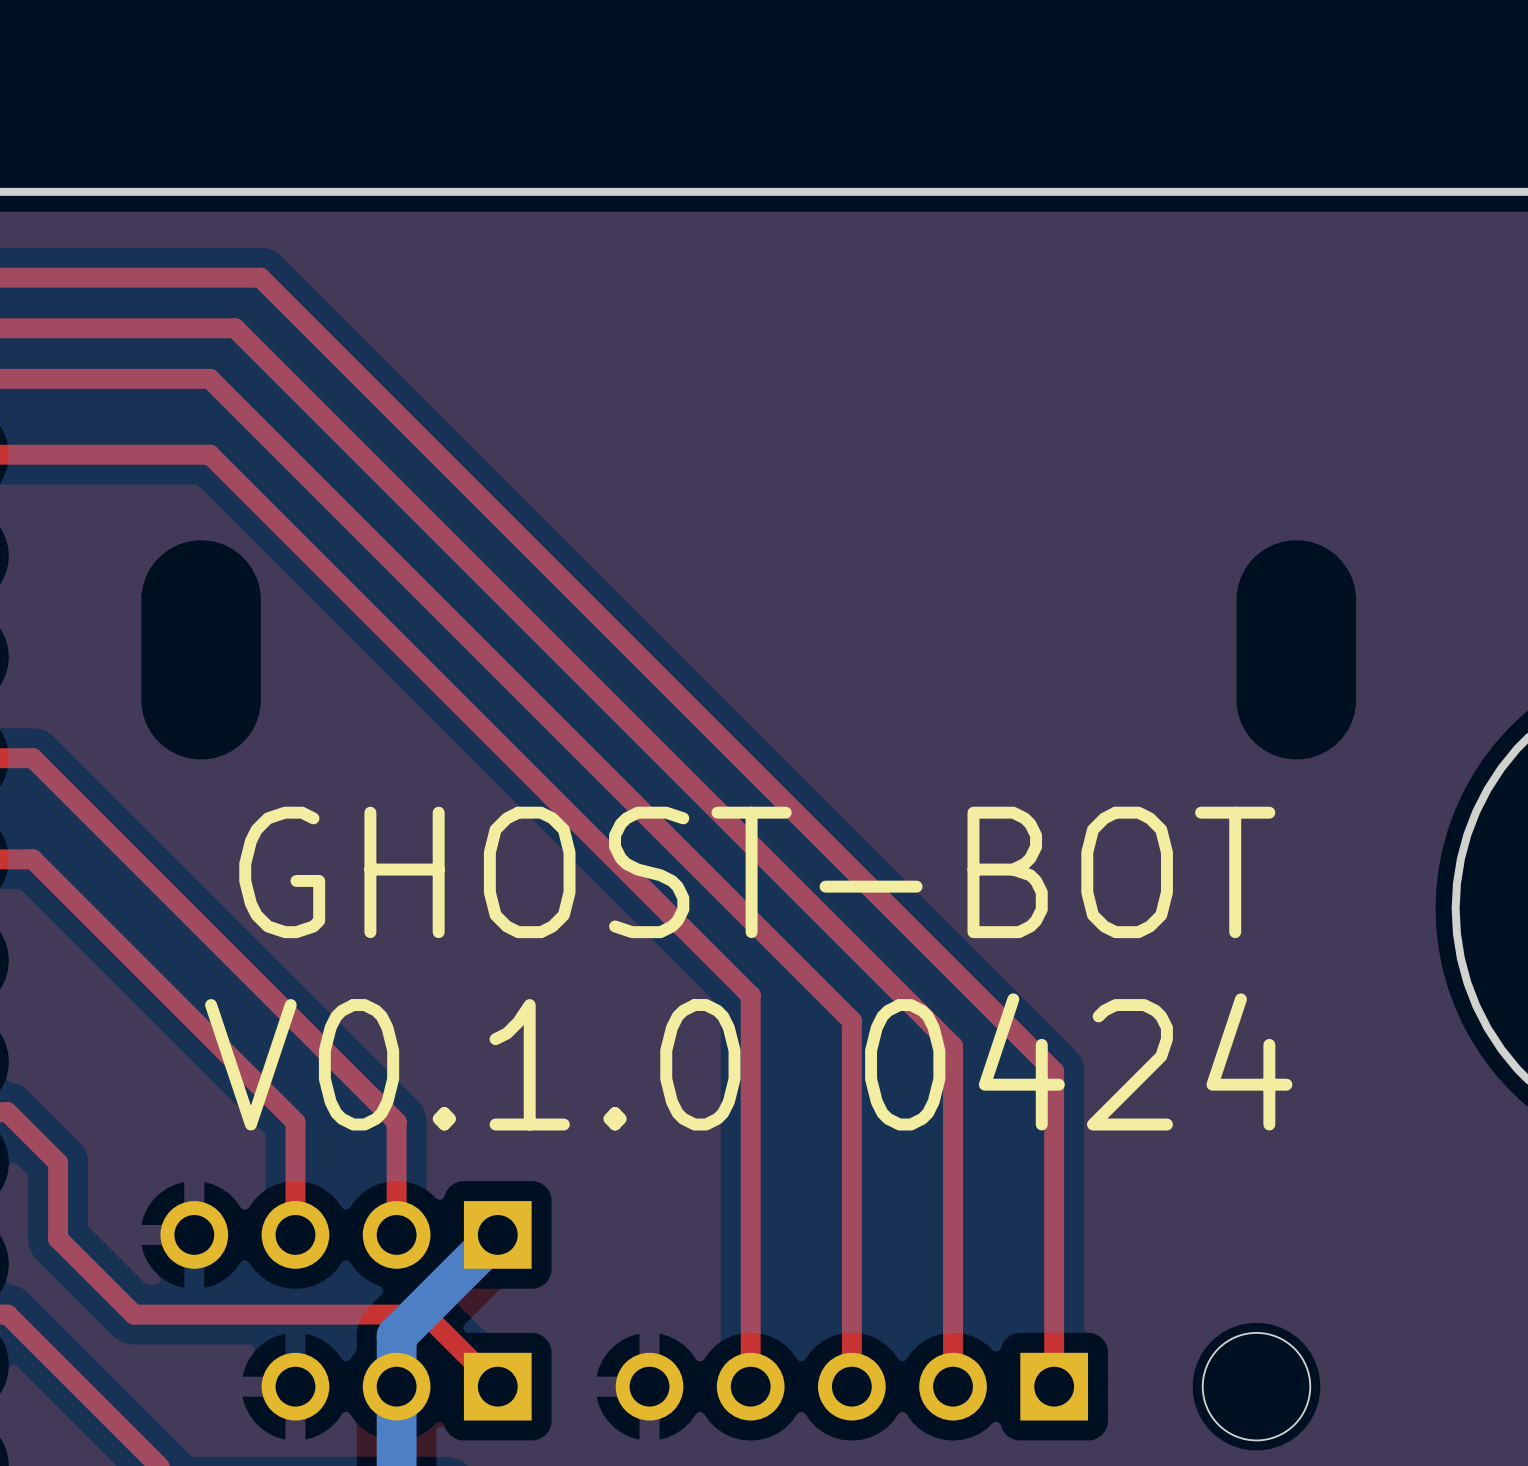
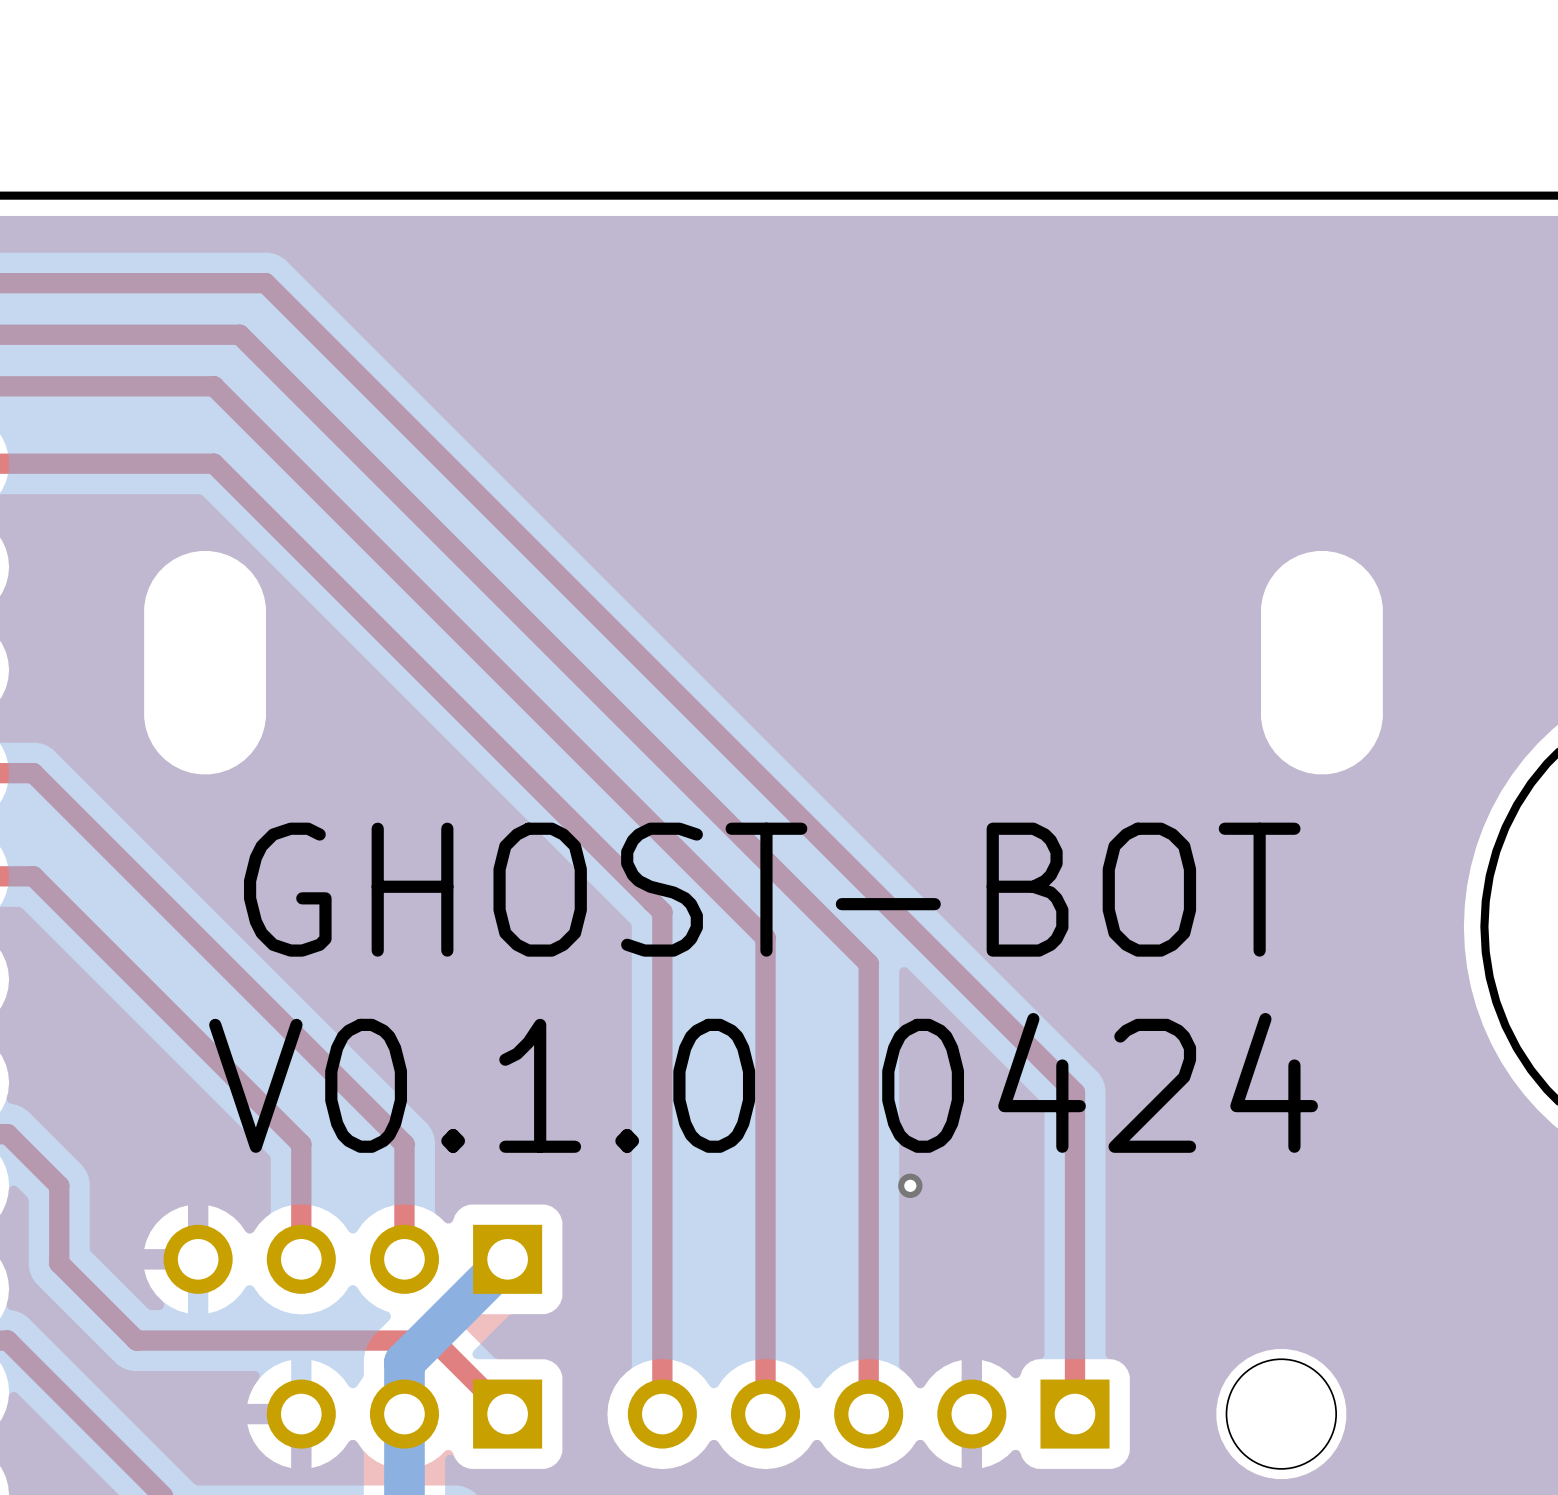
top track: (649, 894) (750, 995) -> (662, 912) (662, 1414)
top track: (750, 919) (851, 1020) -> (765, 937) (765, 1015)
top track: (851, 944) (953, 1046) (953, 1386) -> (868, 963) (868, 1041)
via: none -> (910, 1185)

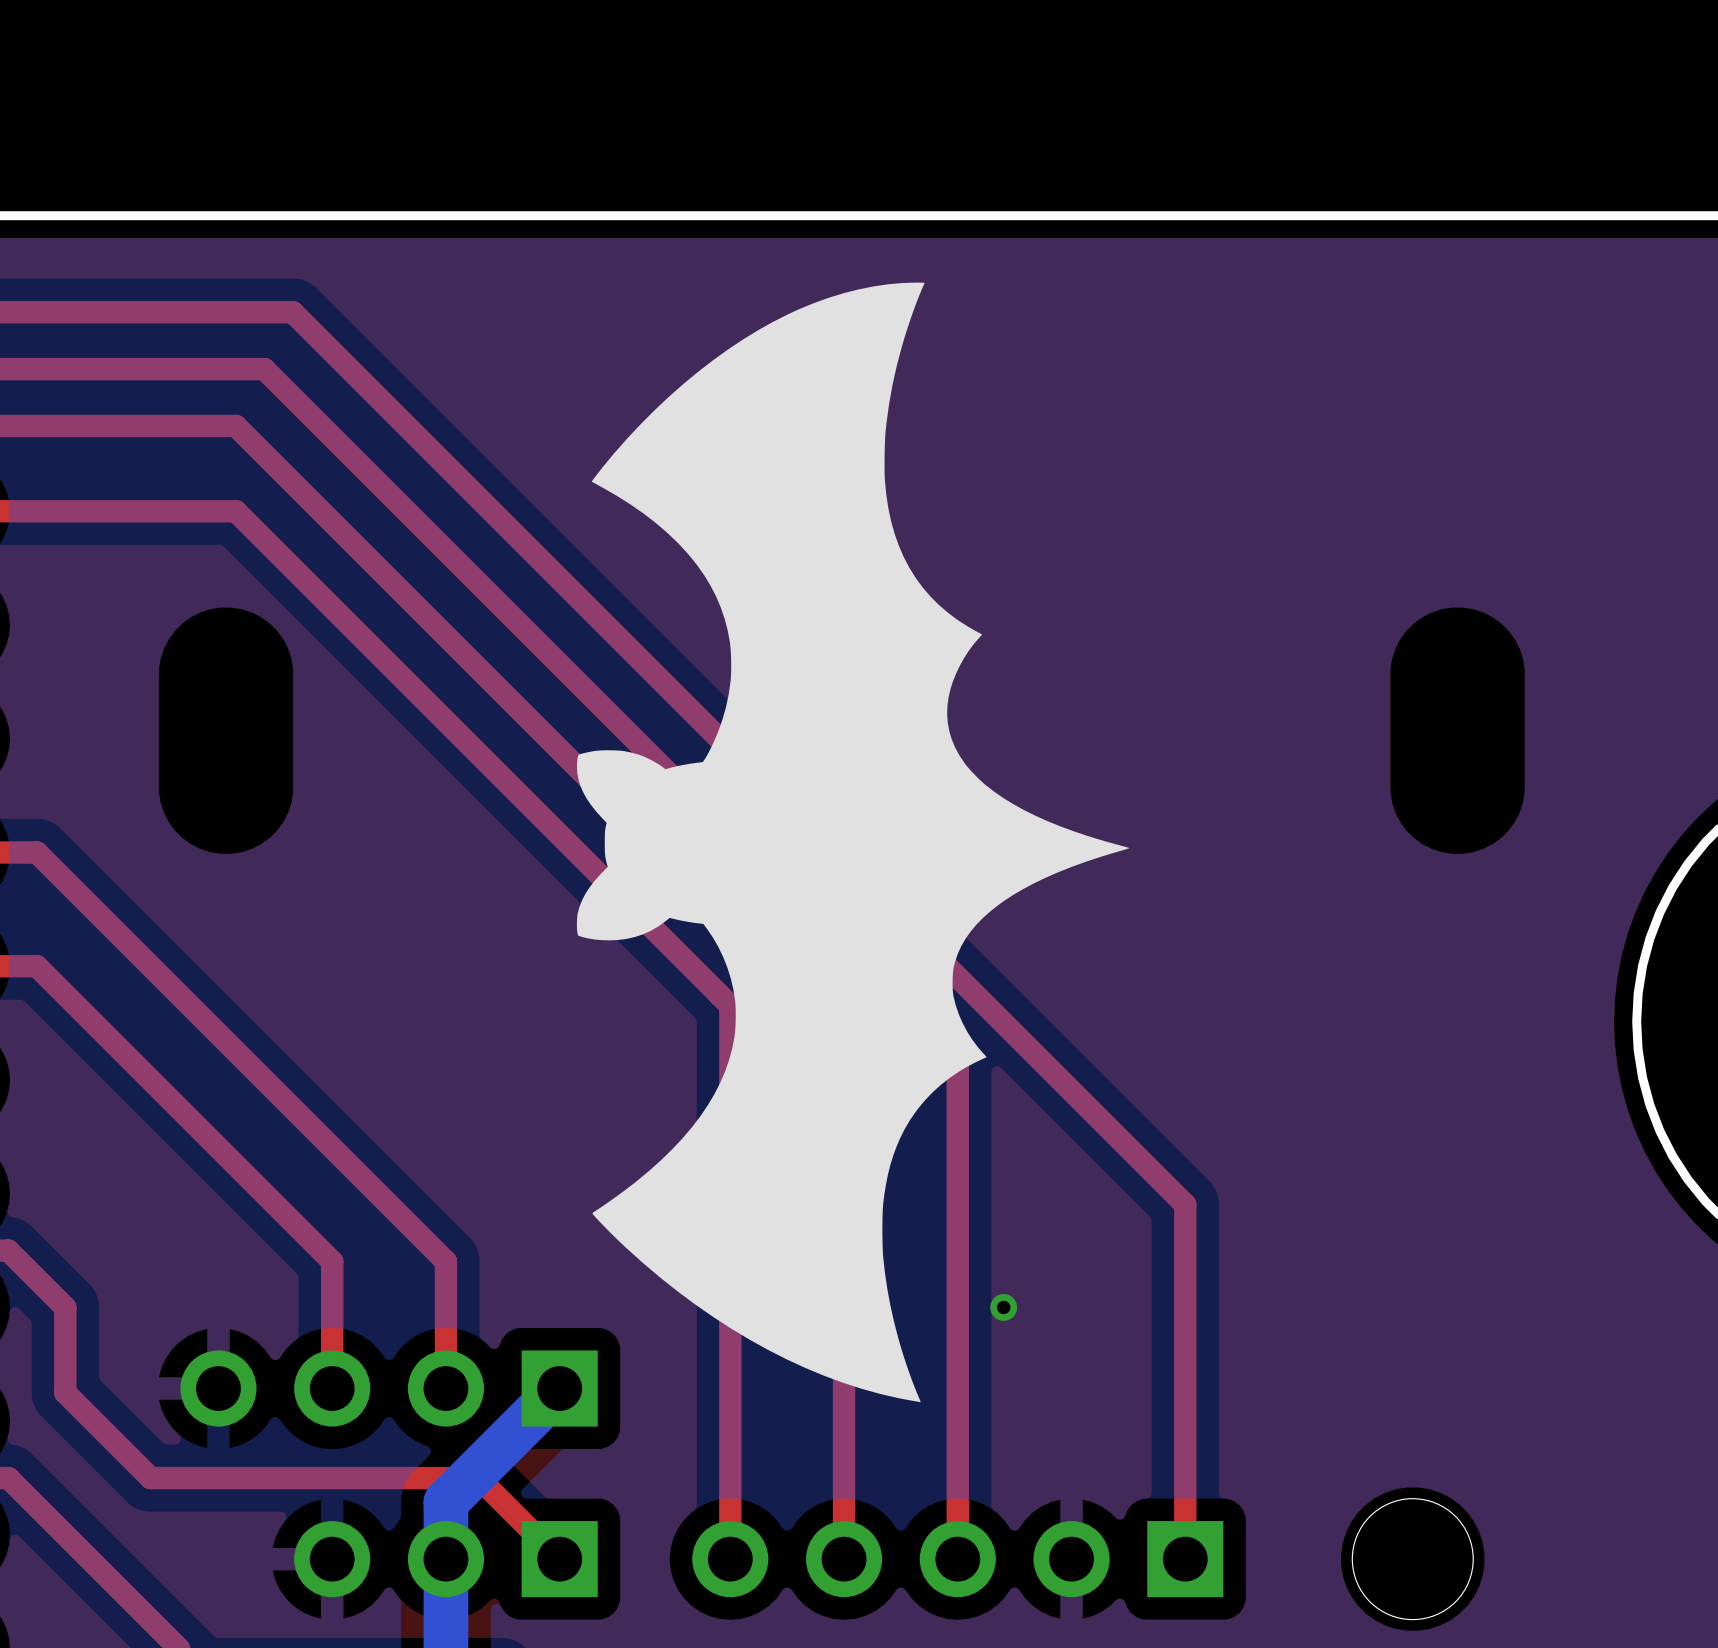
drawing: none -> [576, 282, 1130, 1403]
text: GHOST-BOT (772, 889) -> none
text: V0.1.0 0424 (763, 1082) -> none

